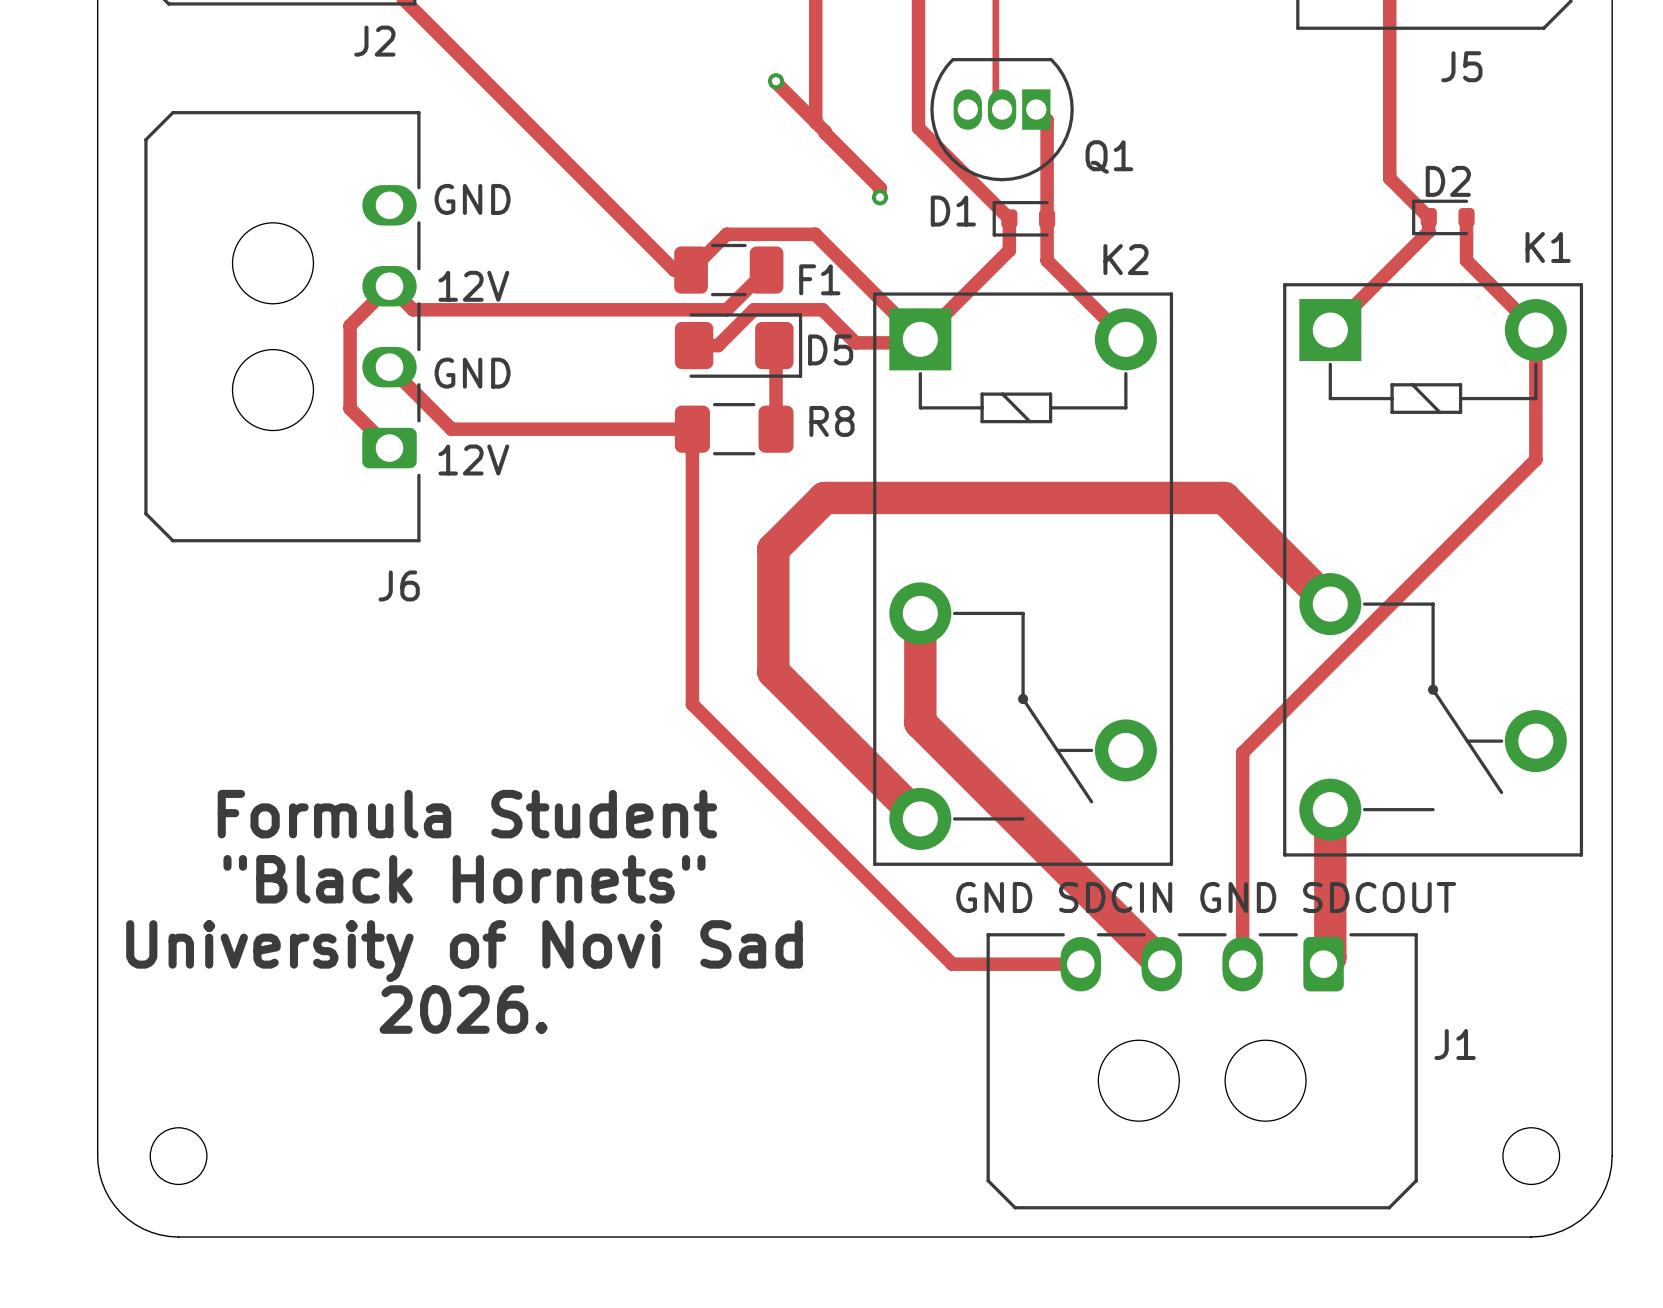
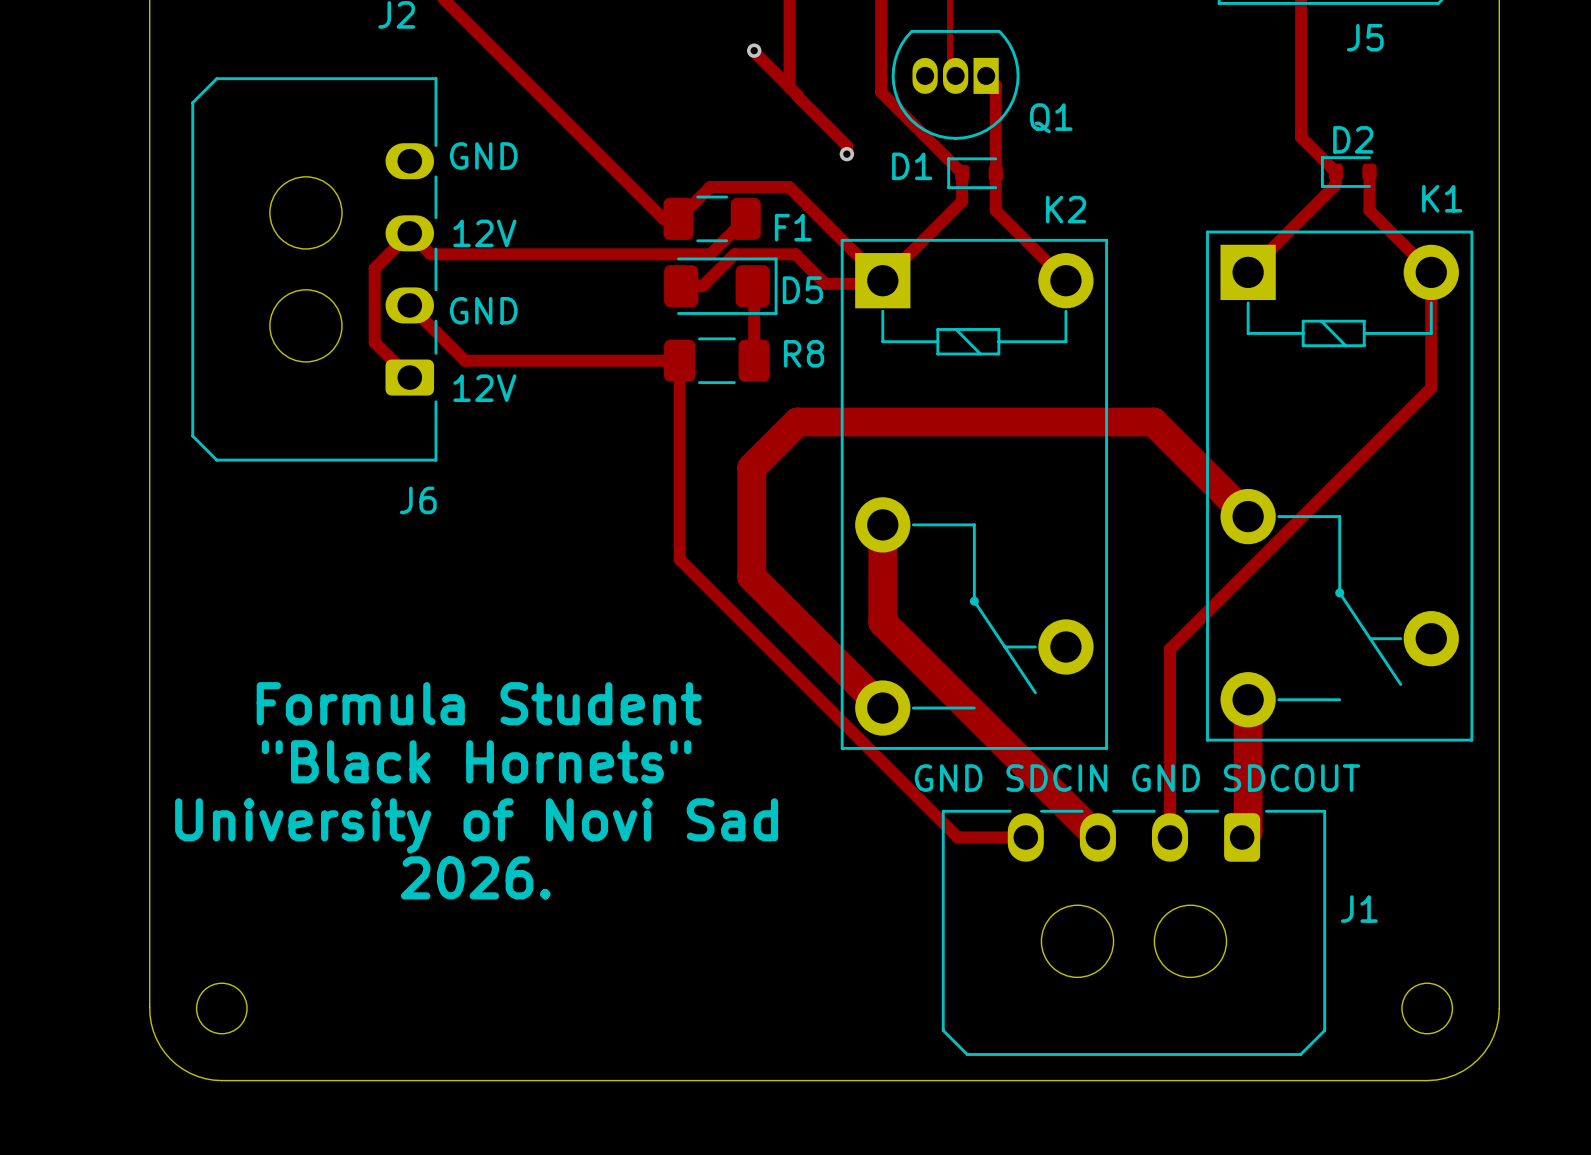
track: (692, 652) (692, 704) (952, 964) (1004, 964) -> (679, 559) (957, 837)

